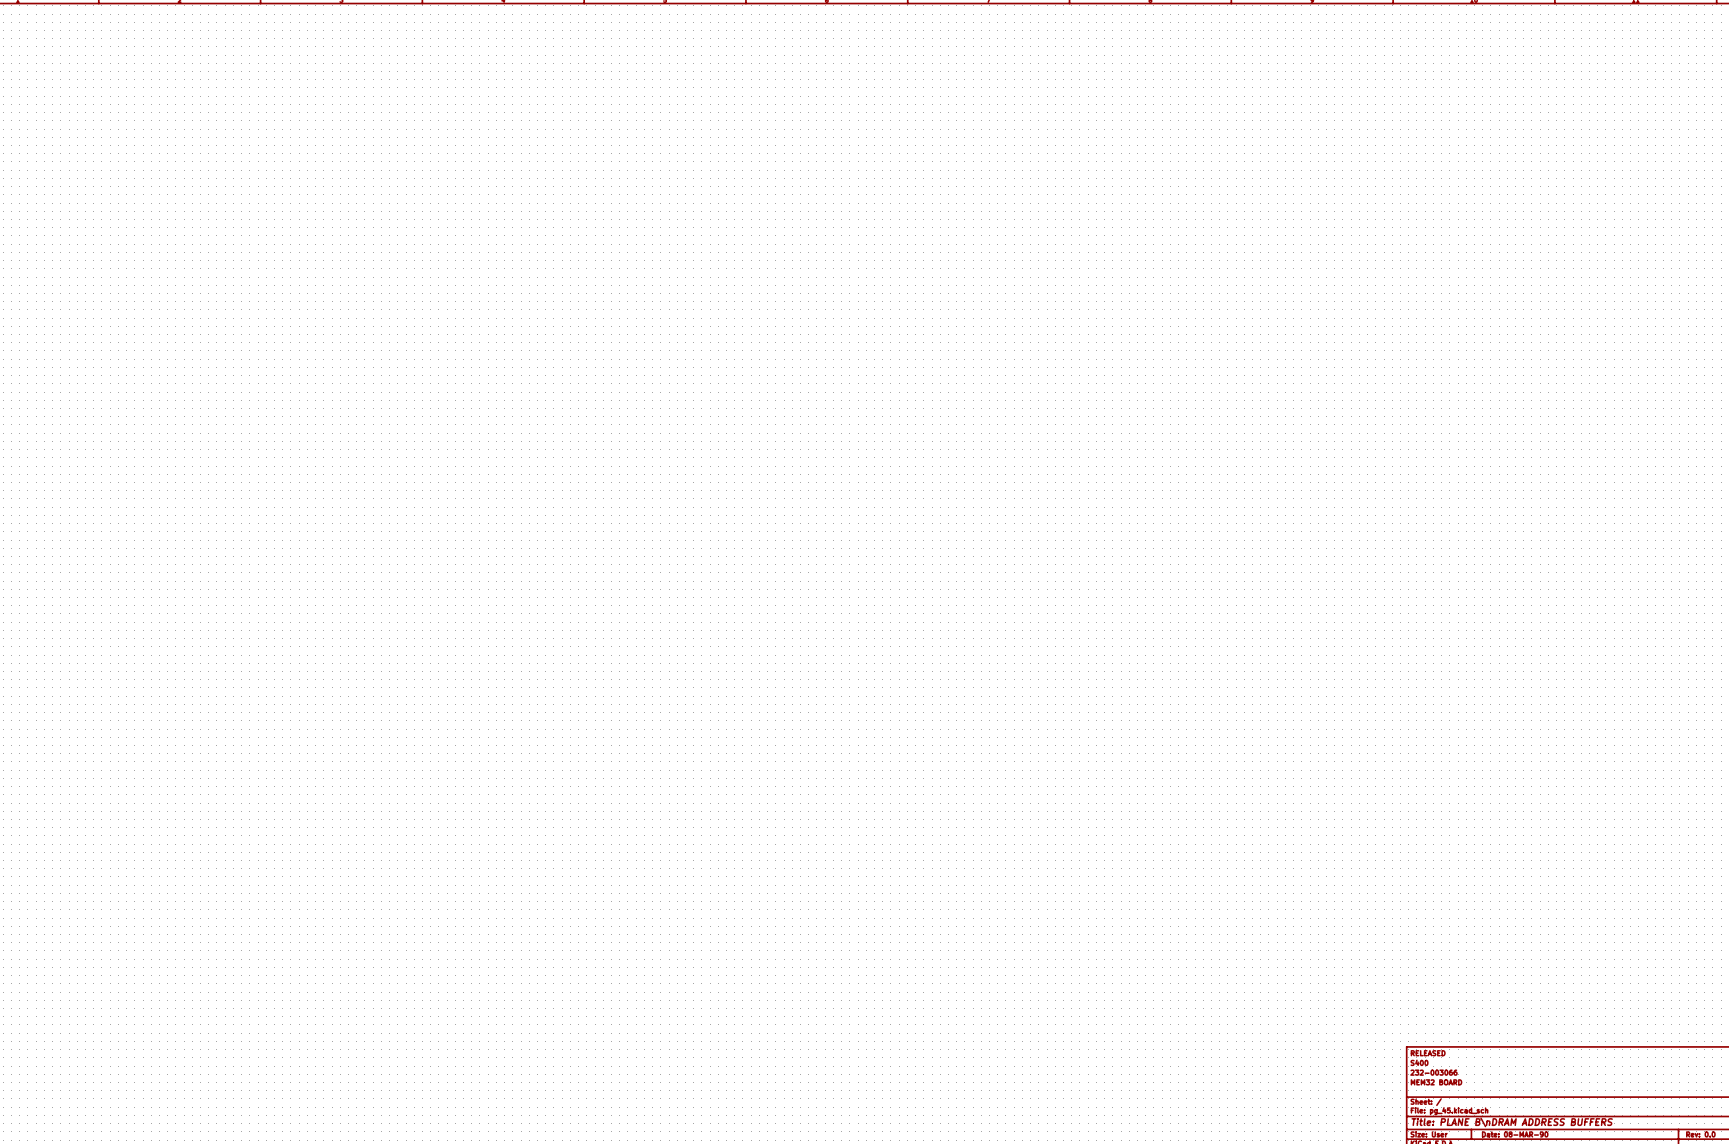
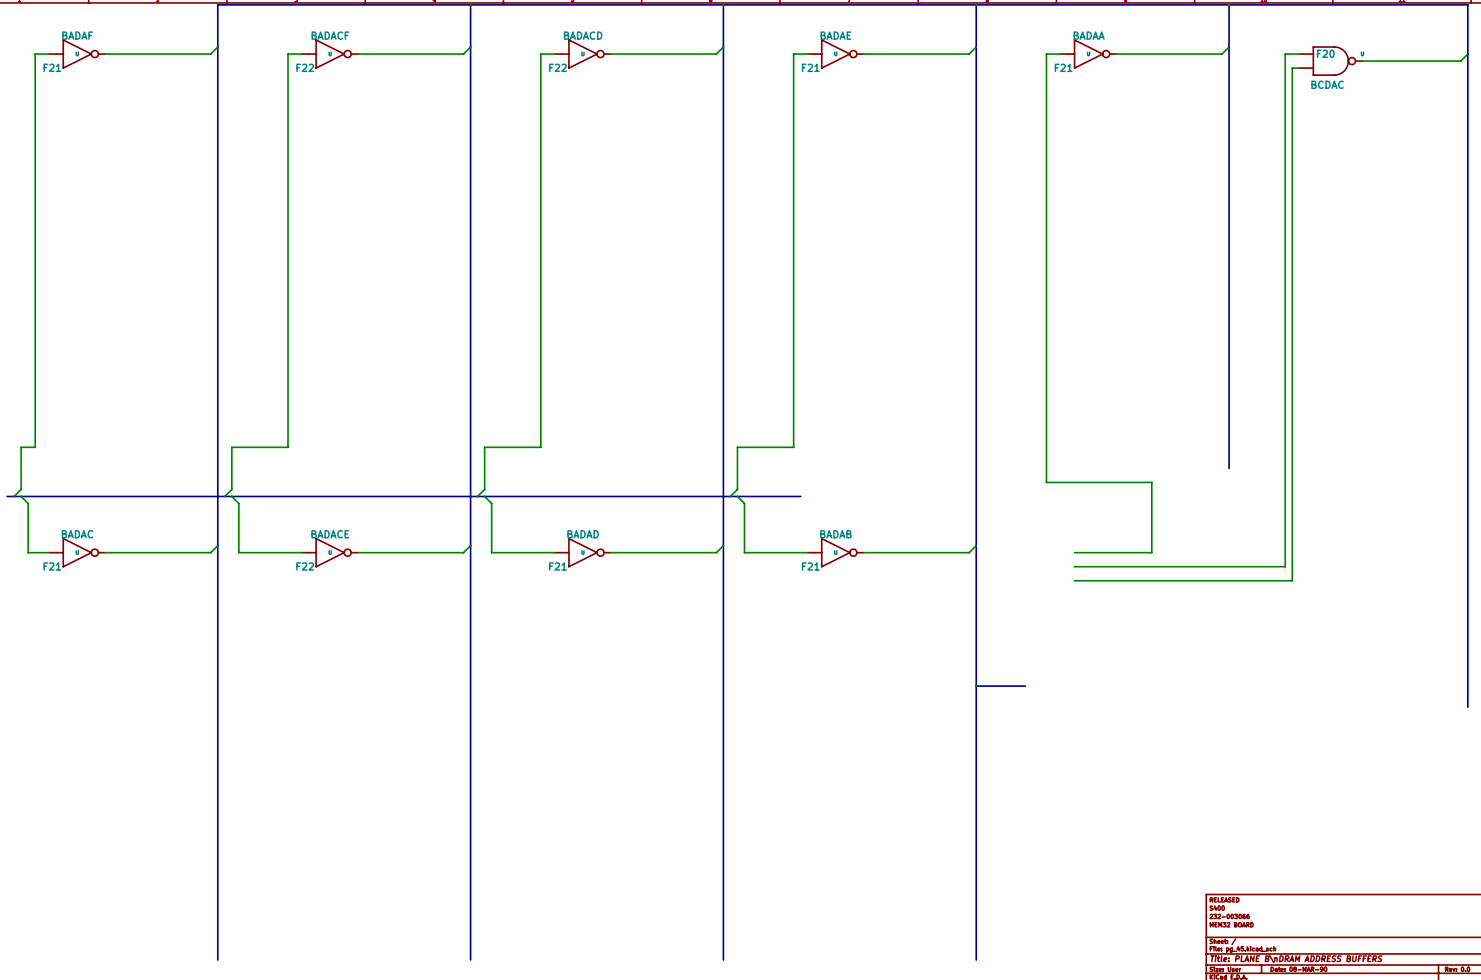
bus: none -> (470, 4) (470, 959)
junction: none -> (470, 4)
bus: none -> (723, 4) (723, 959)
junction: none -> (723, 4)
bus: none -> (976, 4) (976, 959)
junction: none -> (976, 4)
bus: none -> (1229, 4) (1229, 468)
junction: none -> (1229, 4)
wire: none -> (217, 47) (210, 54) (105, 54)
wire: none -> (470, 47) (463, 54) (358, 54)
wire: none -> (723, 47) (716, 54) (611, 54)
wire: none -> (976, 47) (969, 54) (863, 54)
wire: none -> (1229, 47) (1222, 54) (1116, 54)
wire: none -> (49, 54) (35, 54) (35, 447) (21, 447) (21, 489) (14, 496)
part: none -> (77, 54)
wire: none -> (302, 54) (288, 54) (288, 447) (231, 447) (231, 489) (224, 496)
part: none -> (330, 54)
wire: none -> (554, 54) (540, 54) (540, 447) (484, 447) (484, 489) (477, 496)
part: none -> (582, 54)
wire: none -> (807, 54) (793, 54) (793, 447) (737, 447) (737, 489) (730, 496)
part: none -> (835, 54)
wire: none -> (1060, 54) (1046, 54) (1046, 482) (1151, 482) (1151, 552) (1074, 552)
part: none -> (1088, 54)
wire: none -> (1299, 54) (1285, 54) (1285, 566) (1074, 566)
wire: none -> (1467, 54) (1460, 61) (1362, 61)
part: none -> (1330, 61)
wire: none -> (1299, 68) (1292, 68) (1292, 580) (1074, 580)
bus: none -> (7, 496) (800, 496)
wire: none -> (21, 496) (28, 503) (28, 552) (49, 552)
wire: none -> (231, 496) (238, 503) (238, 552) (302, 552)
wire: none -> (484, 496) (491, 503) (491, 552) (554, 552)
wire: none -> (737, 496) (744, 503) (744, 552) (807, 552)
wire: none -> (217, 545) (210, 552) (105, 552)
wire: none -> (470, 545) (463, 552) (358, 552)
wire: none -> (723, 545) (716, 552) (611, 552)
wire: none -> (976, 545) (969, 552) (863, 552)
part: none -> (77, 552)
part: none -> (330, 552)
part: none -> (582, 552)
part: none -> (835, 552)
bus: none -> (976, 686) (1025, 686)
junction: none -> (976, 686)
bus: none -> (1467, 707) (1467, 4) (217, 4) (217, 959)

